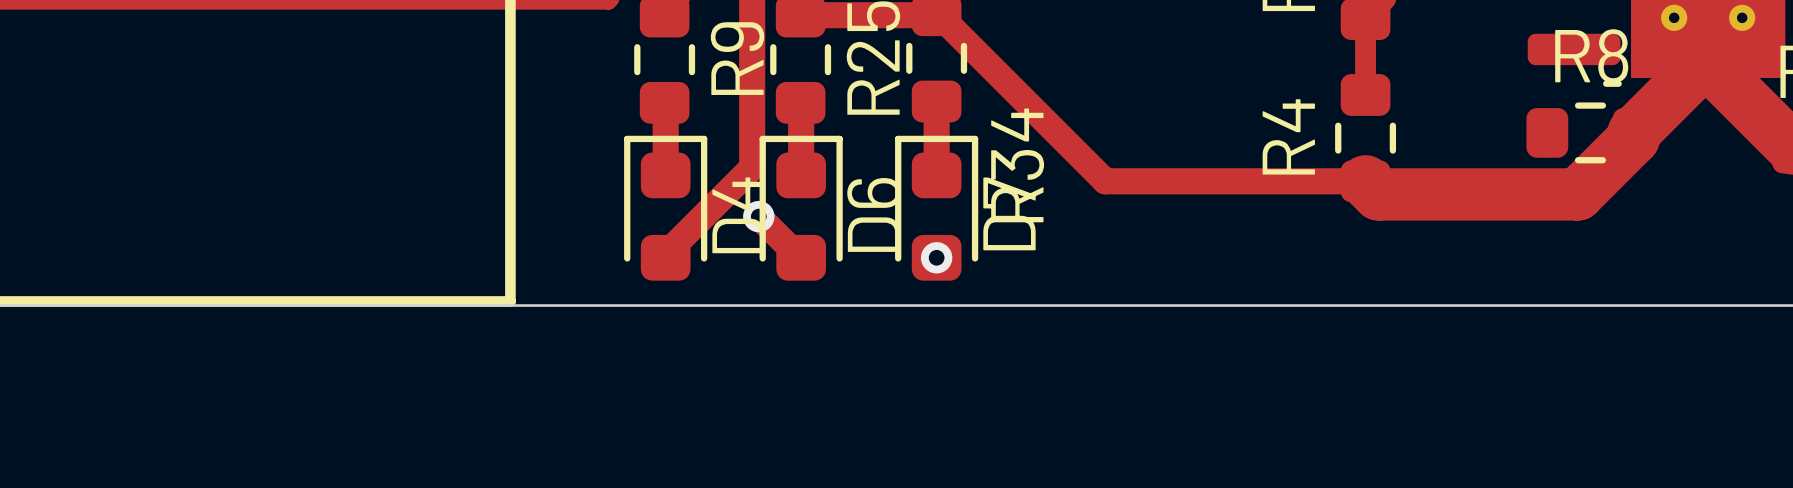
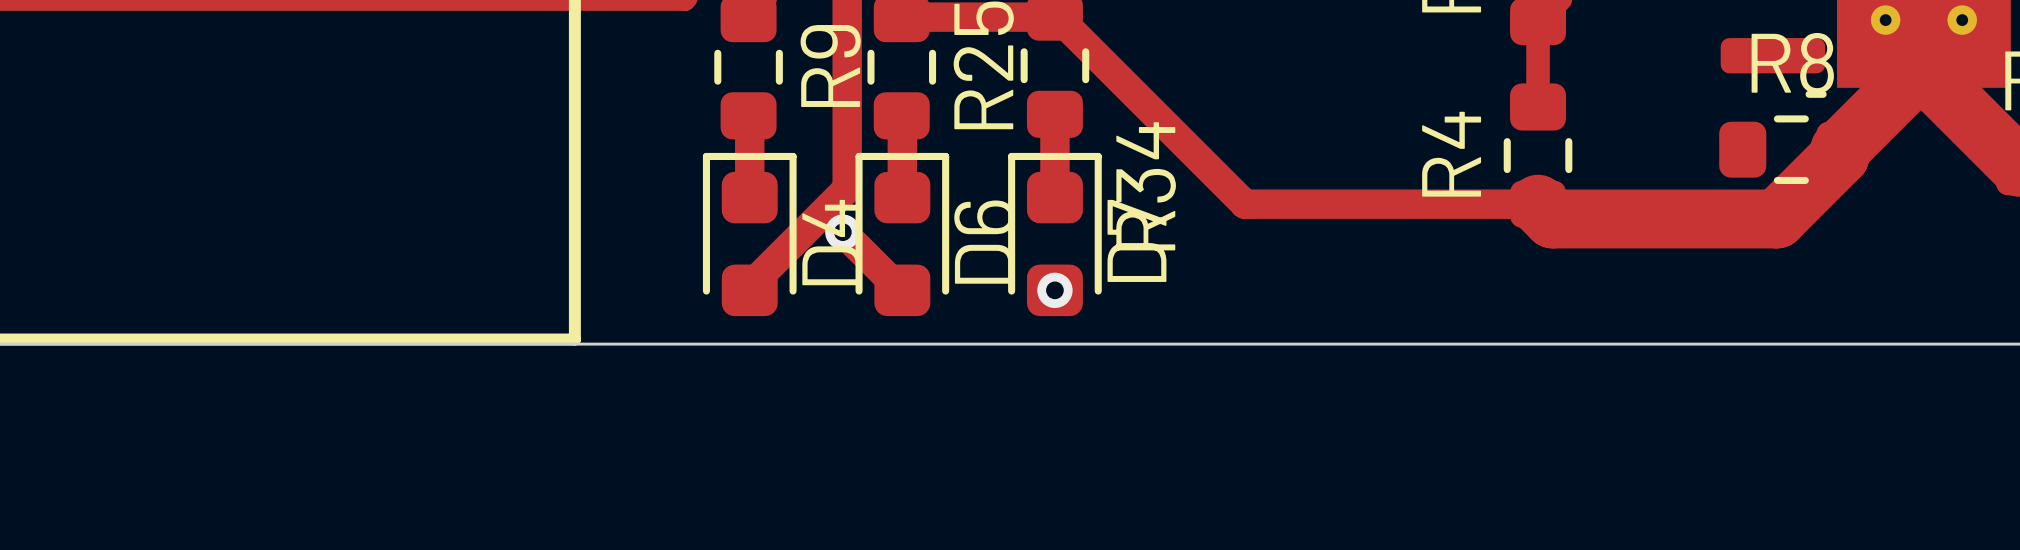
via position: (758, 216) -> (842, 232)

